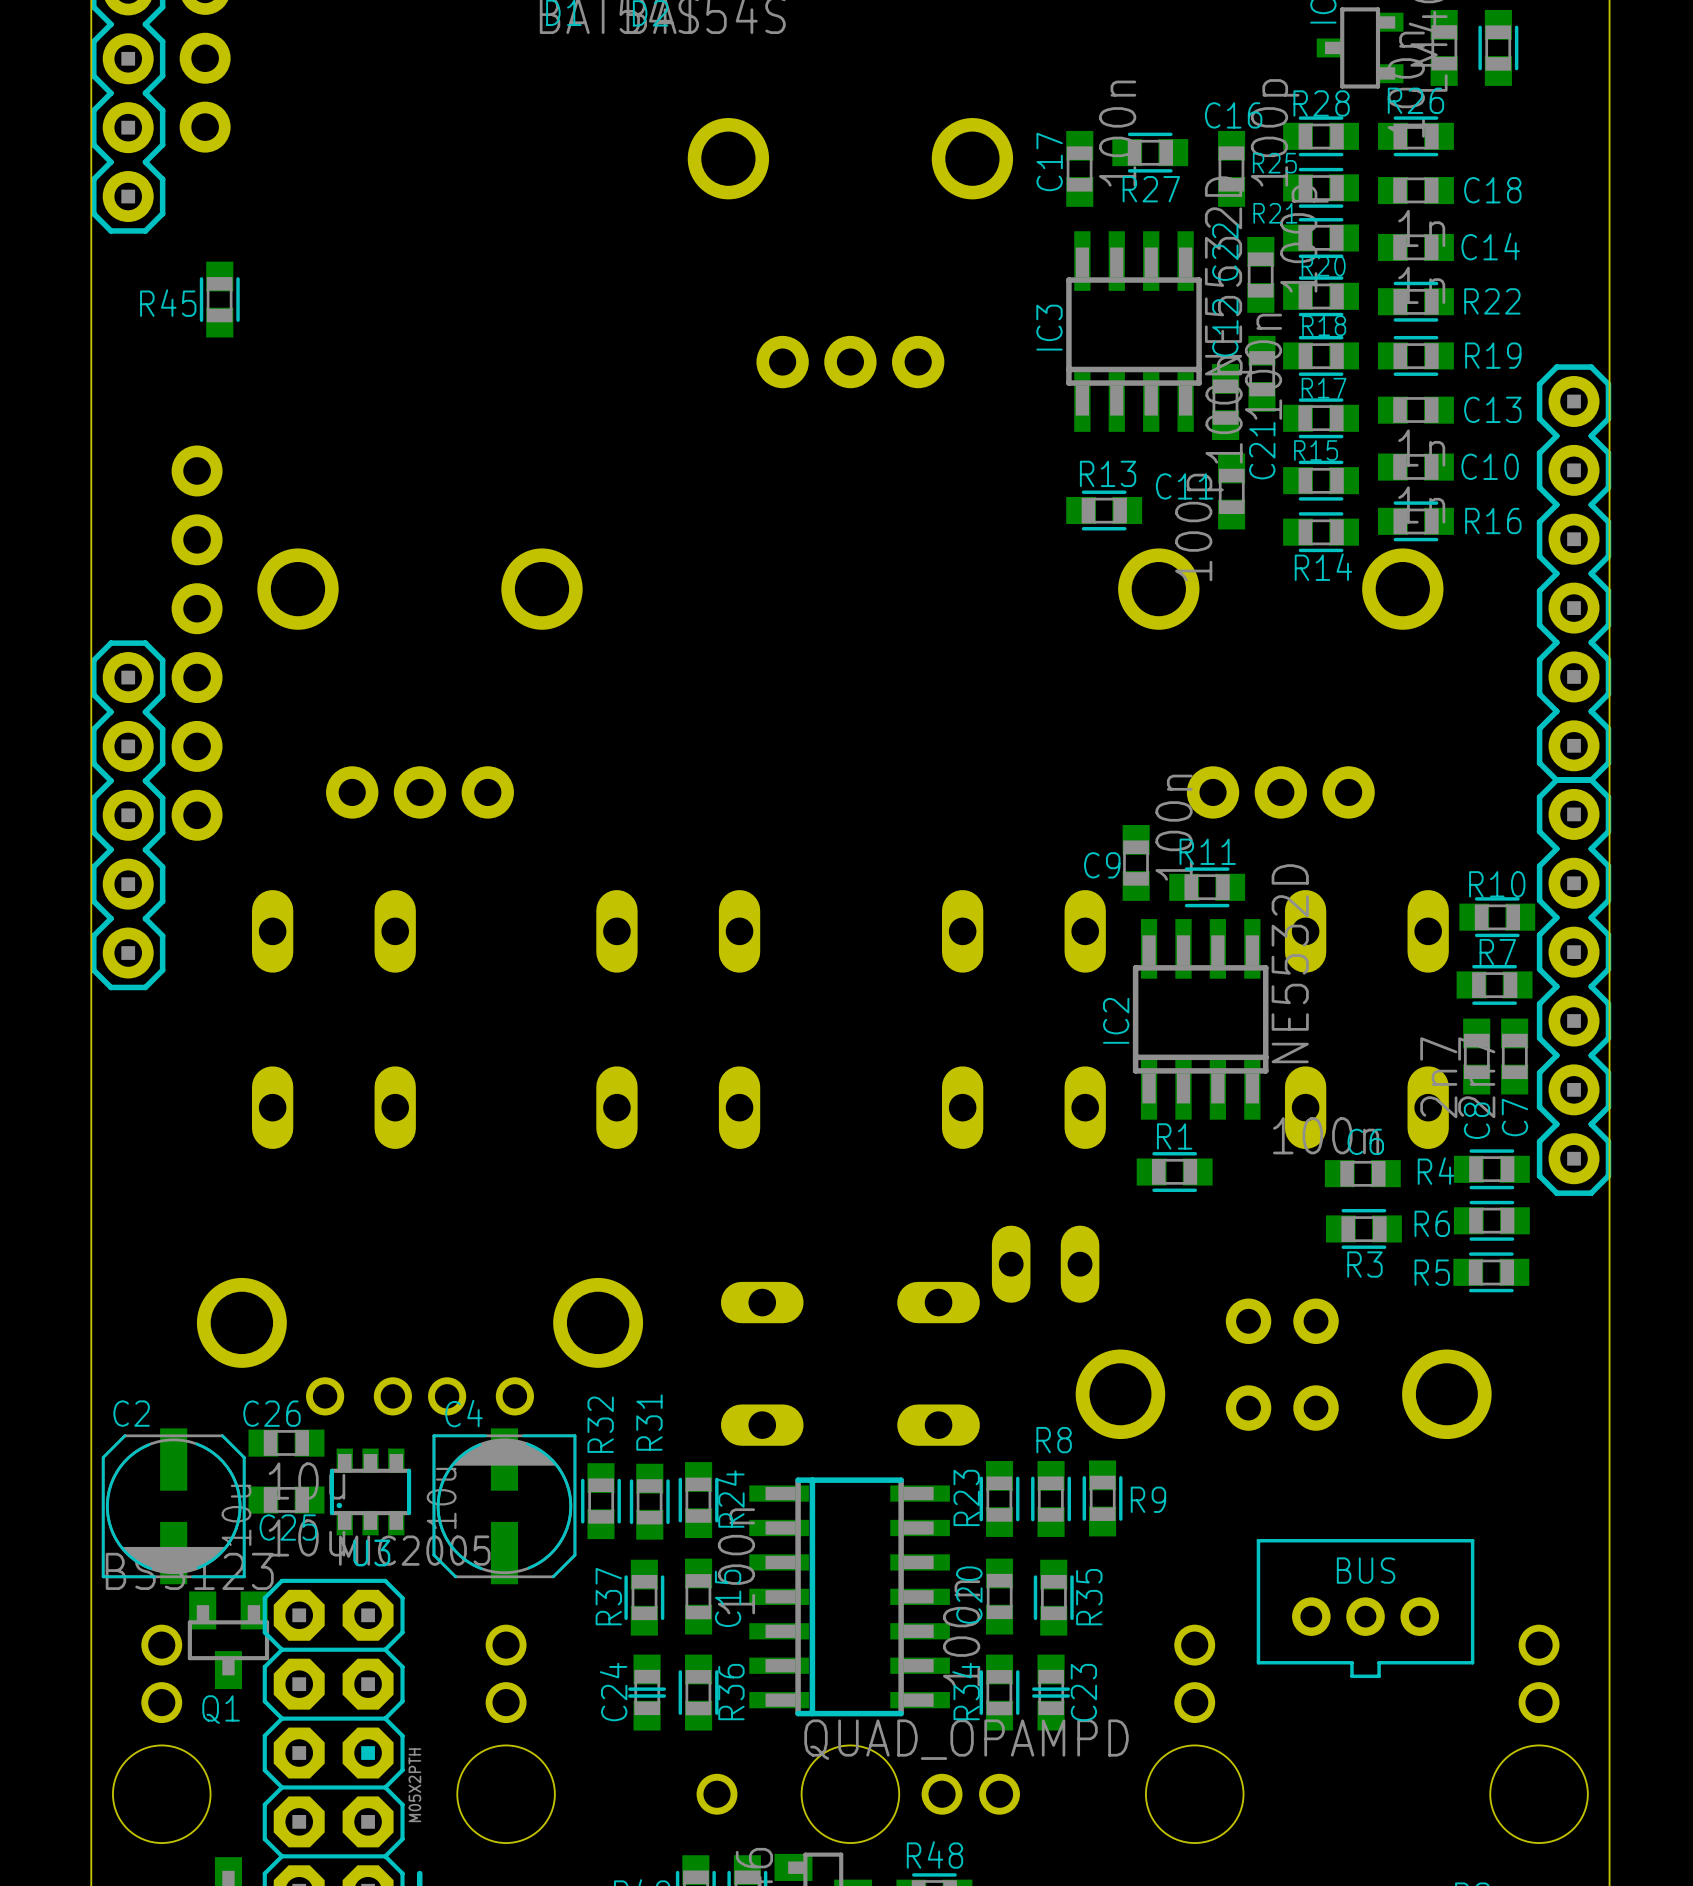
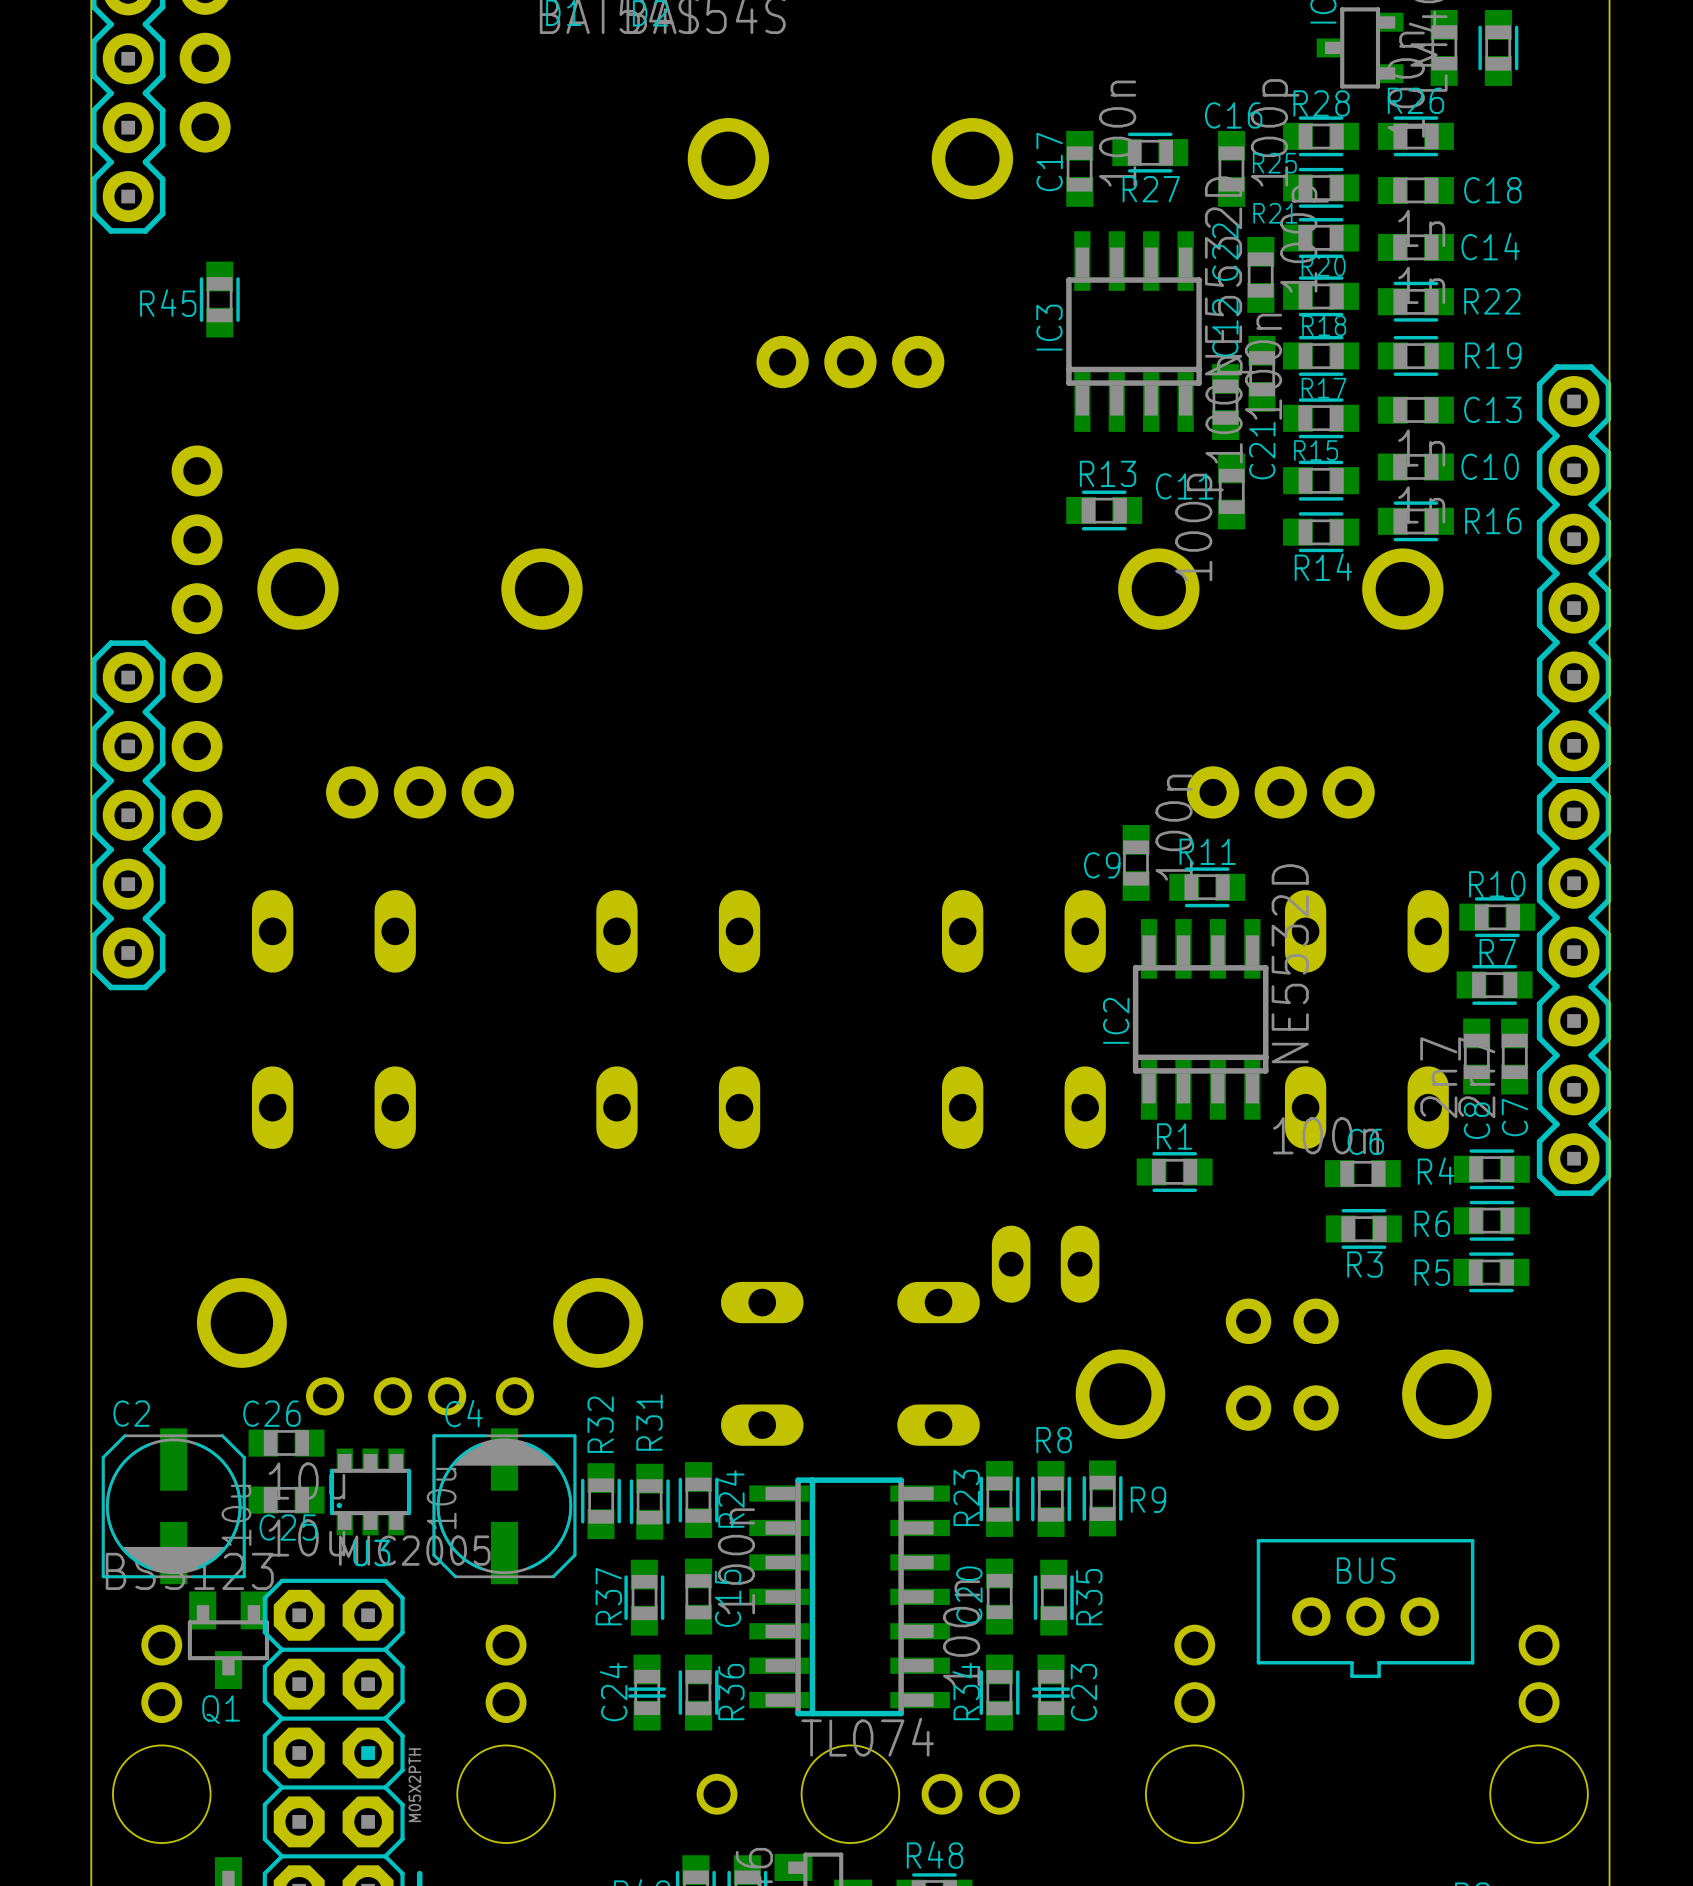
part value: QUAD_OPAMPD (966, 1739) -> TL074 (867, 1737)

